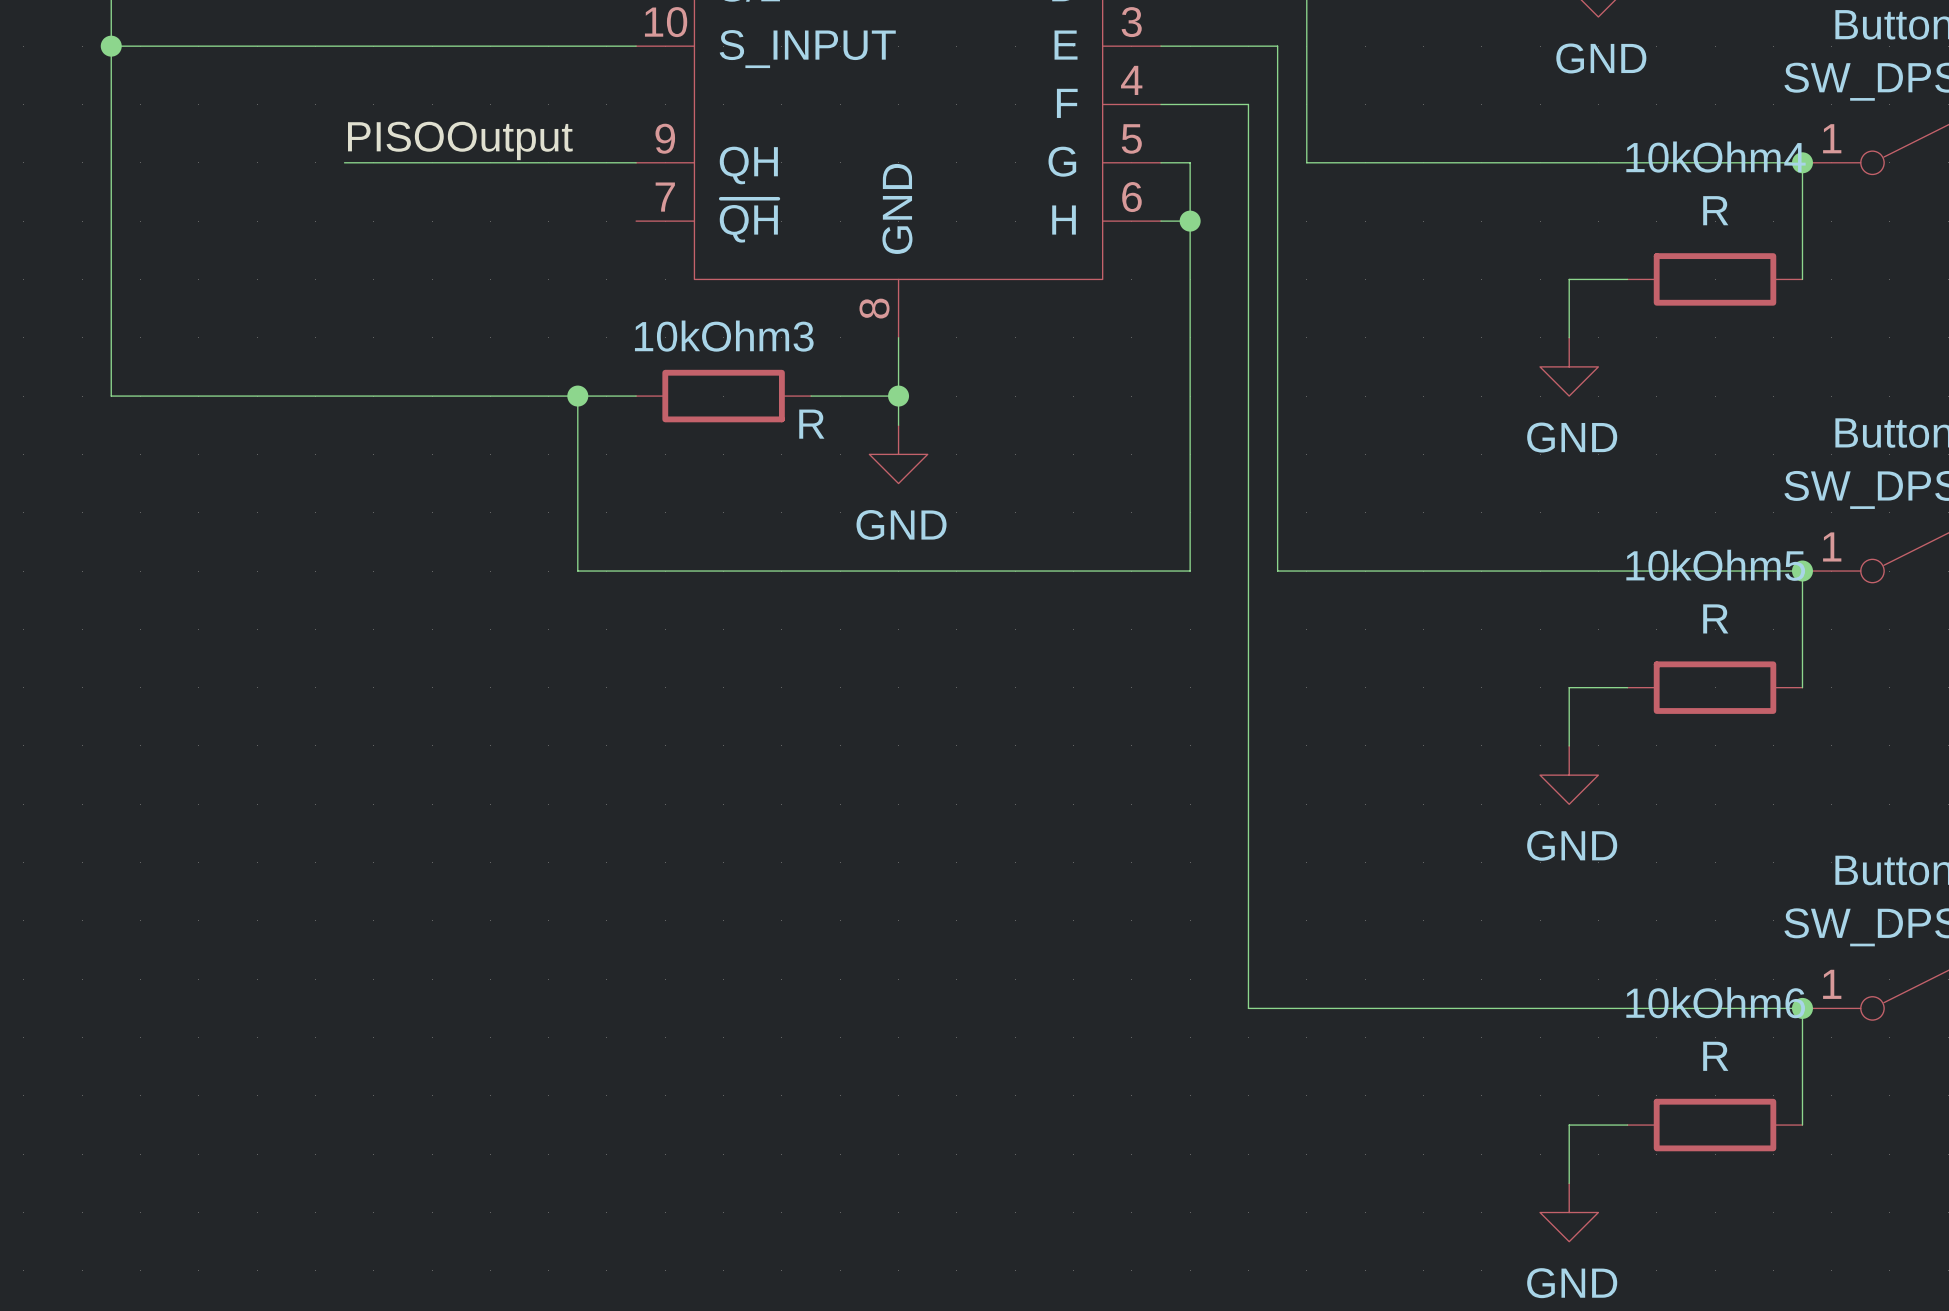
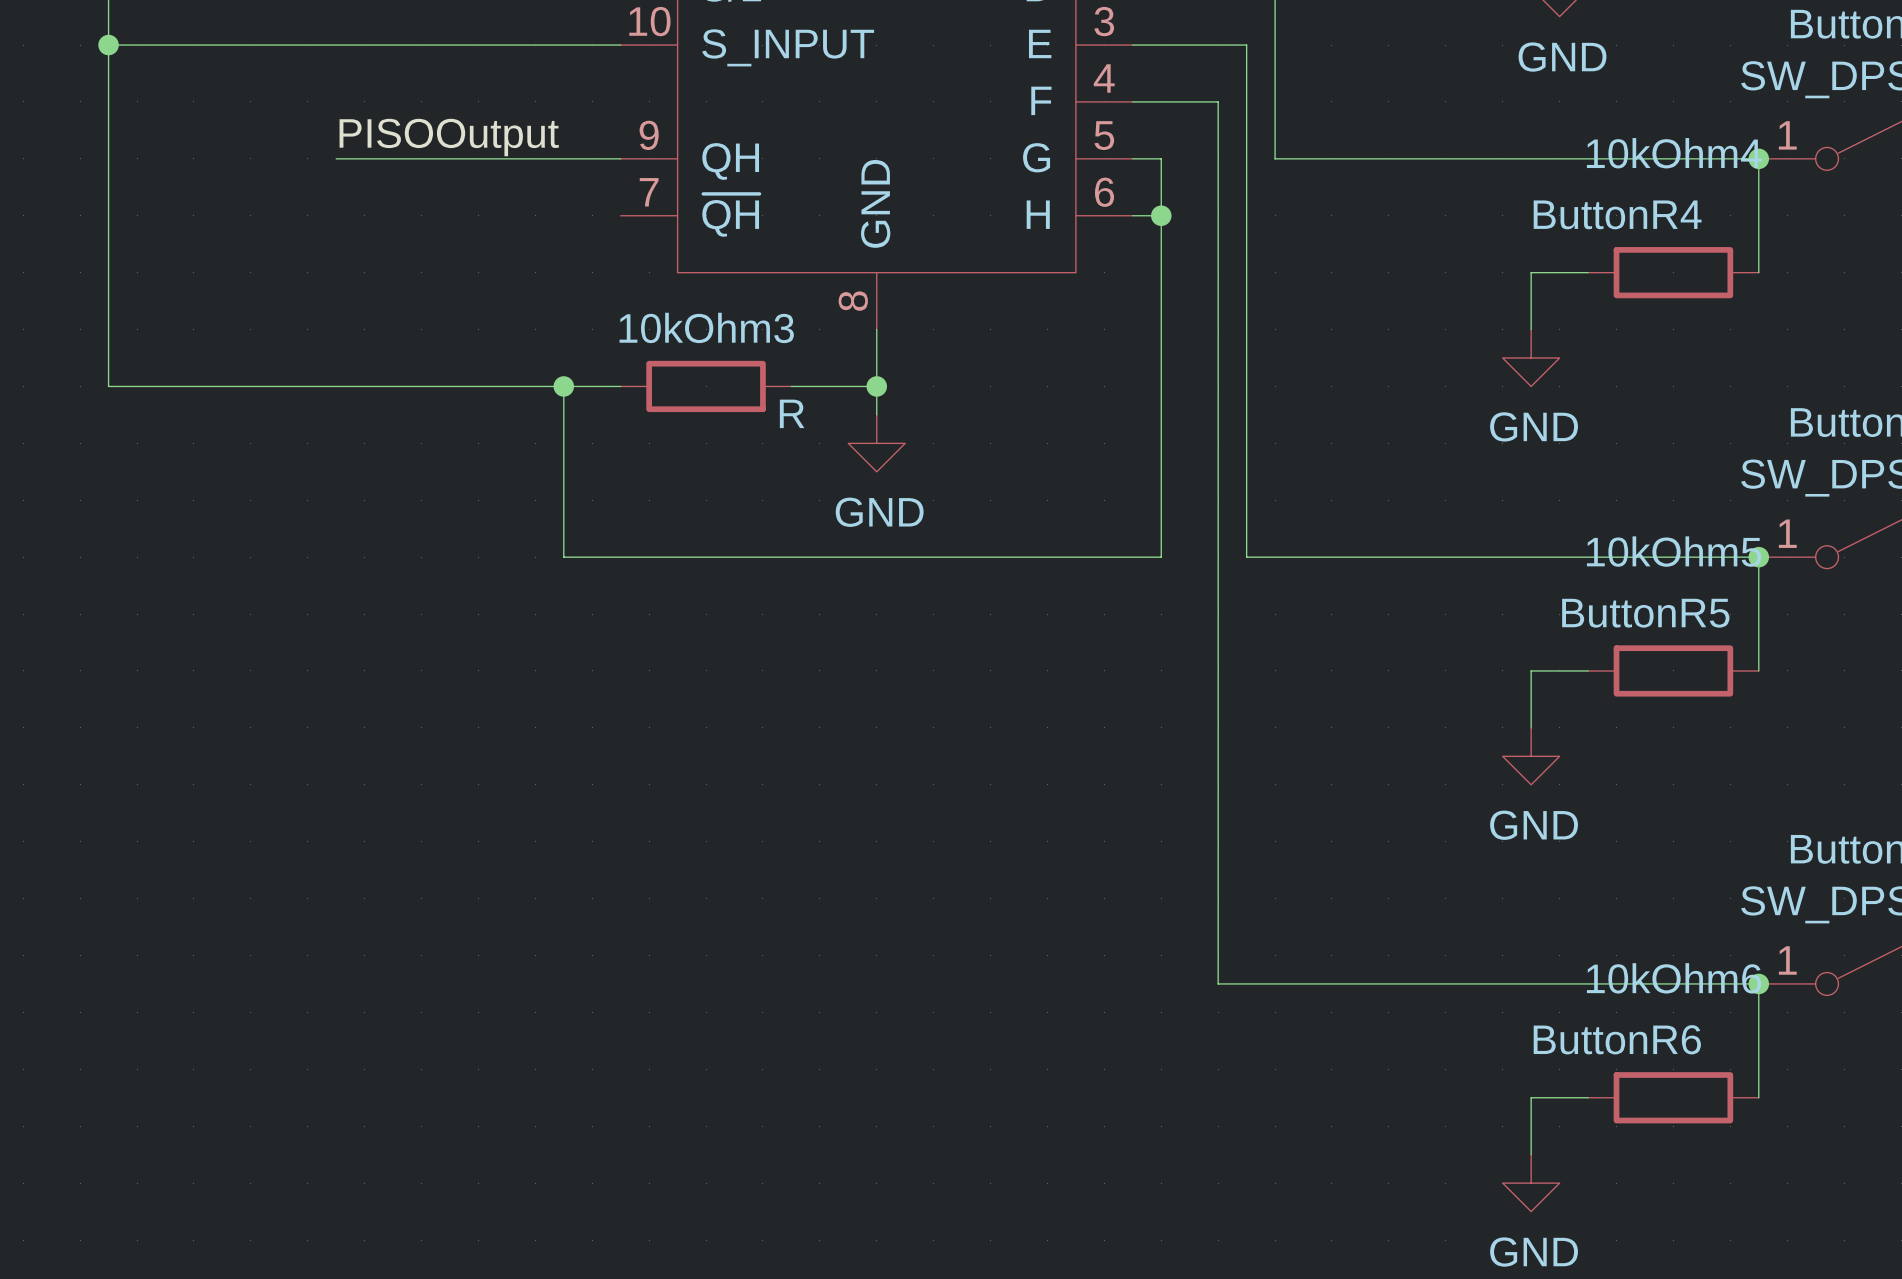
10kOhm4 value: R (1715, 210) -> ButtonR4 (1617, 214)
10kOhm5 value: R (1715, 618) -> ButtonR5 (1645, 613)
10kOhm6 value: R (1715, 1056) -> ButtonR6 (1617, 1039)

